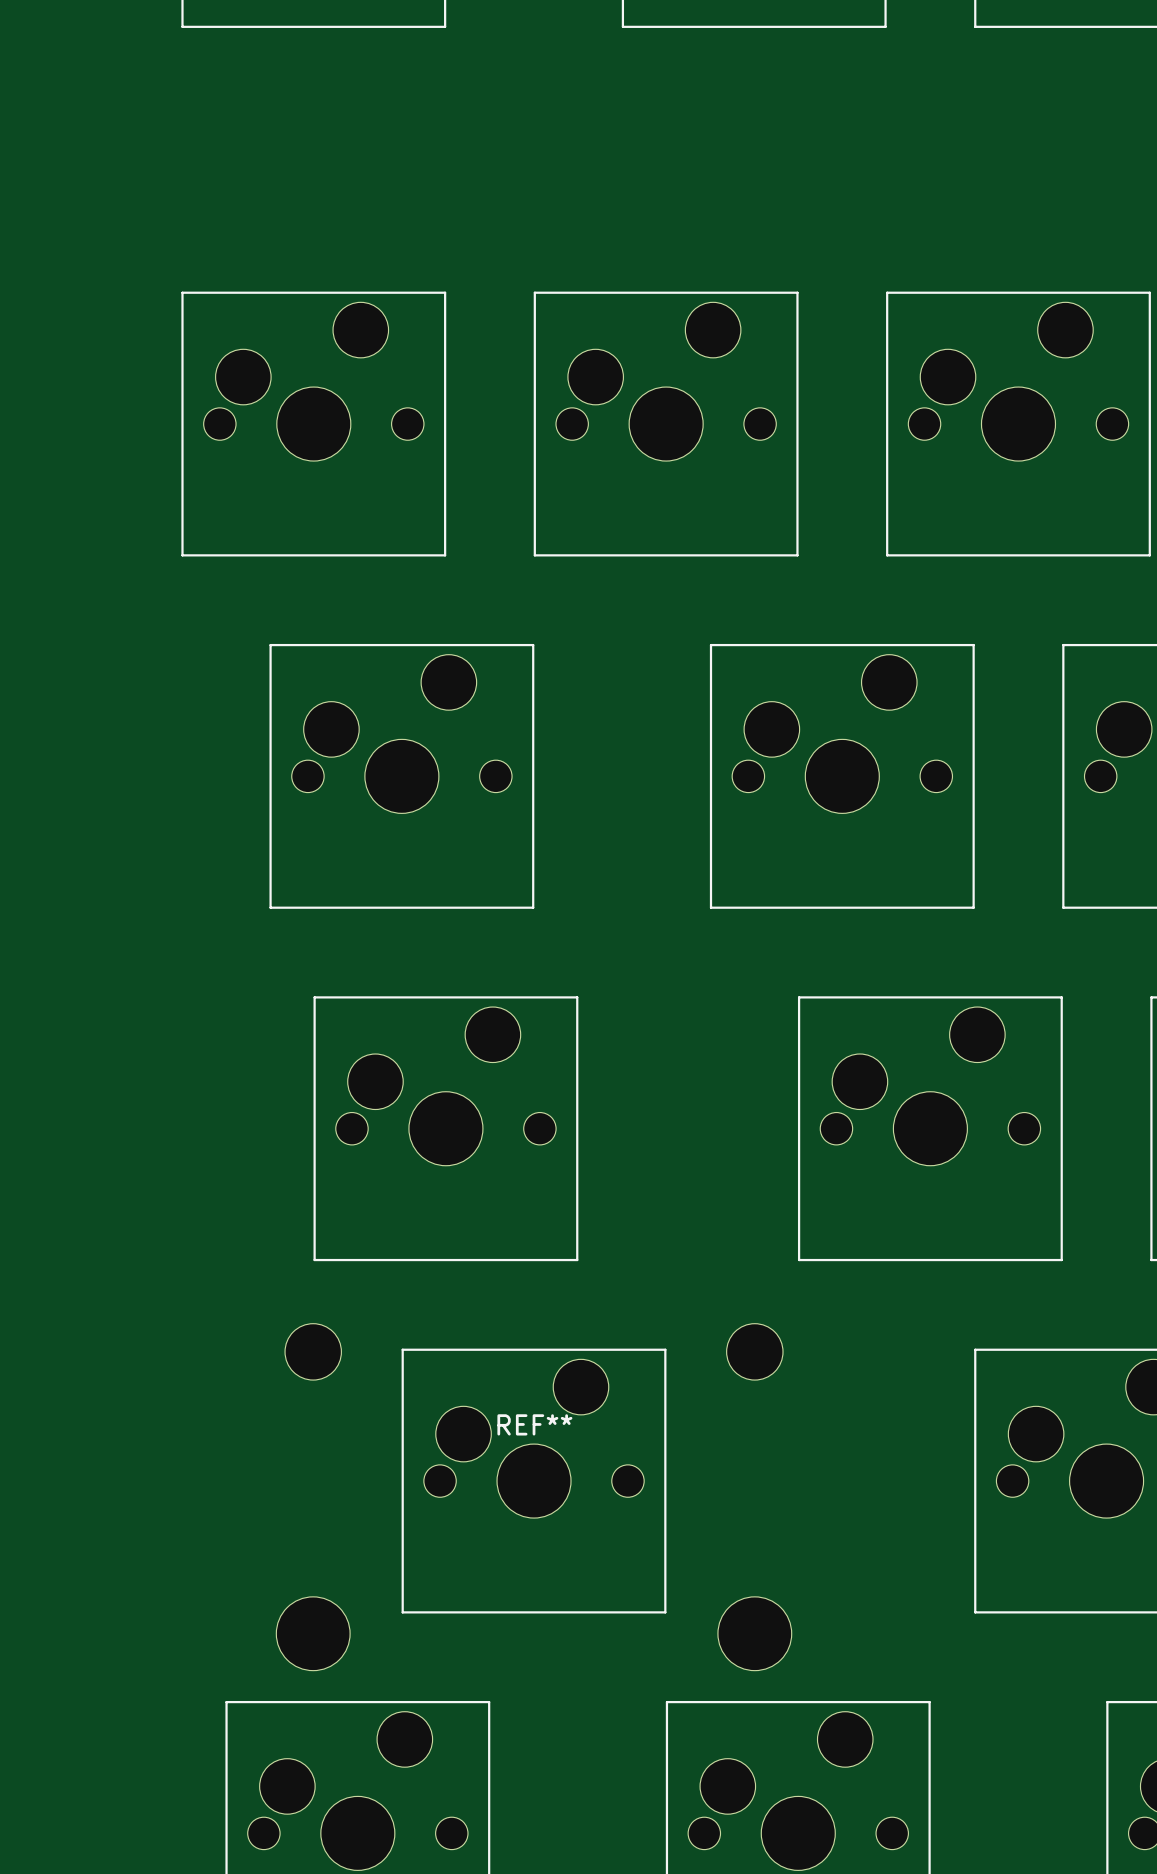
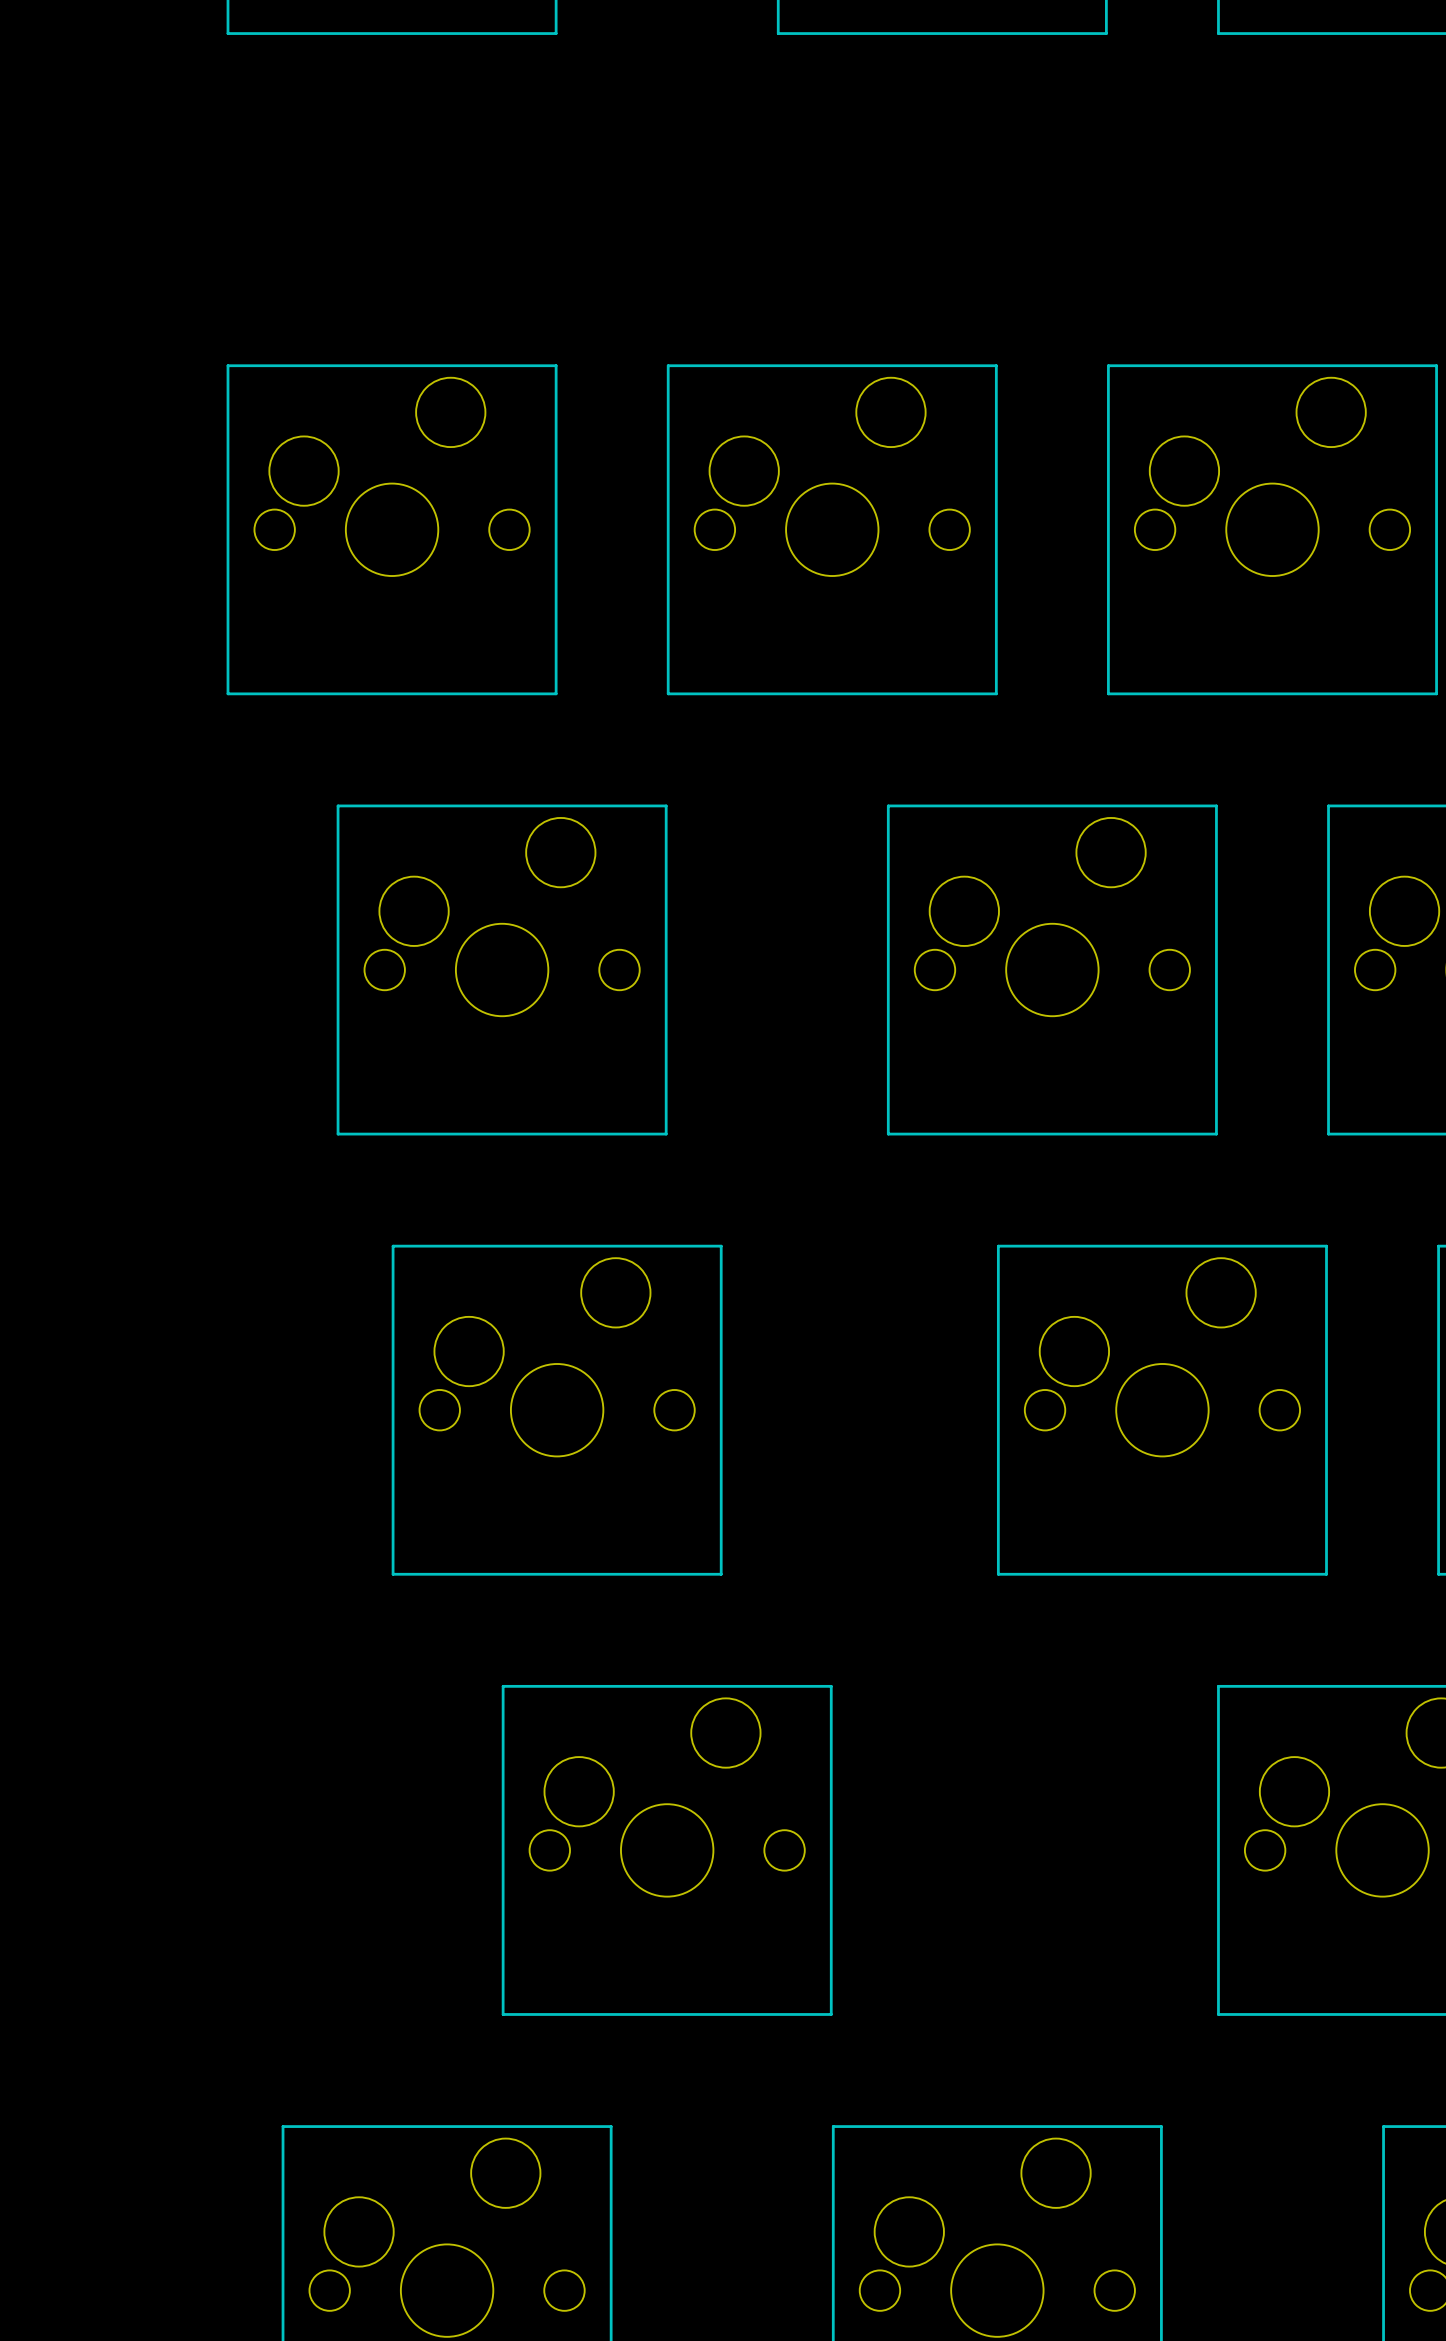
REF**: (534, 1497) -> none

